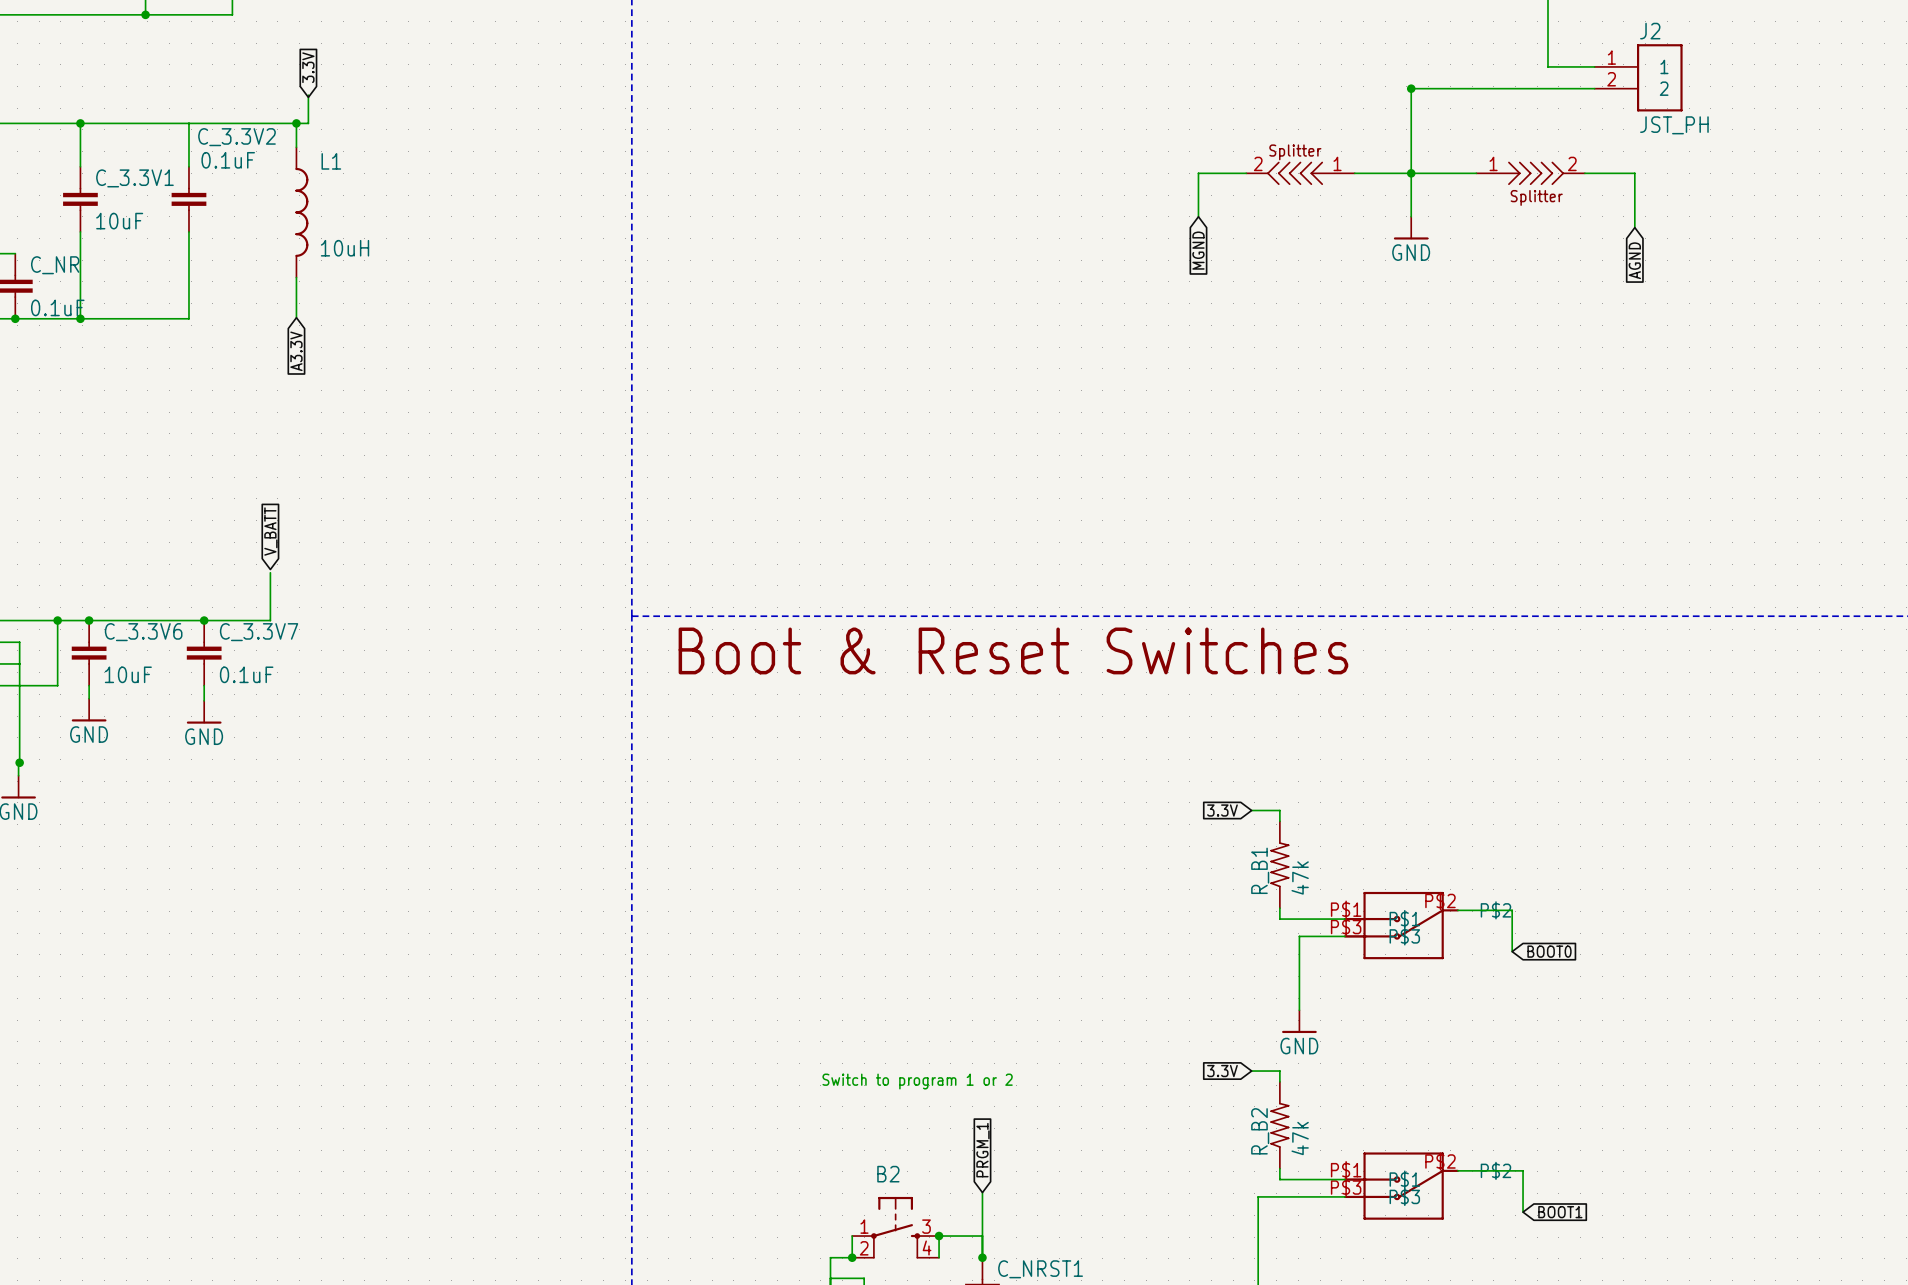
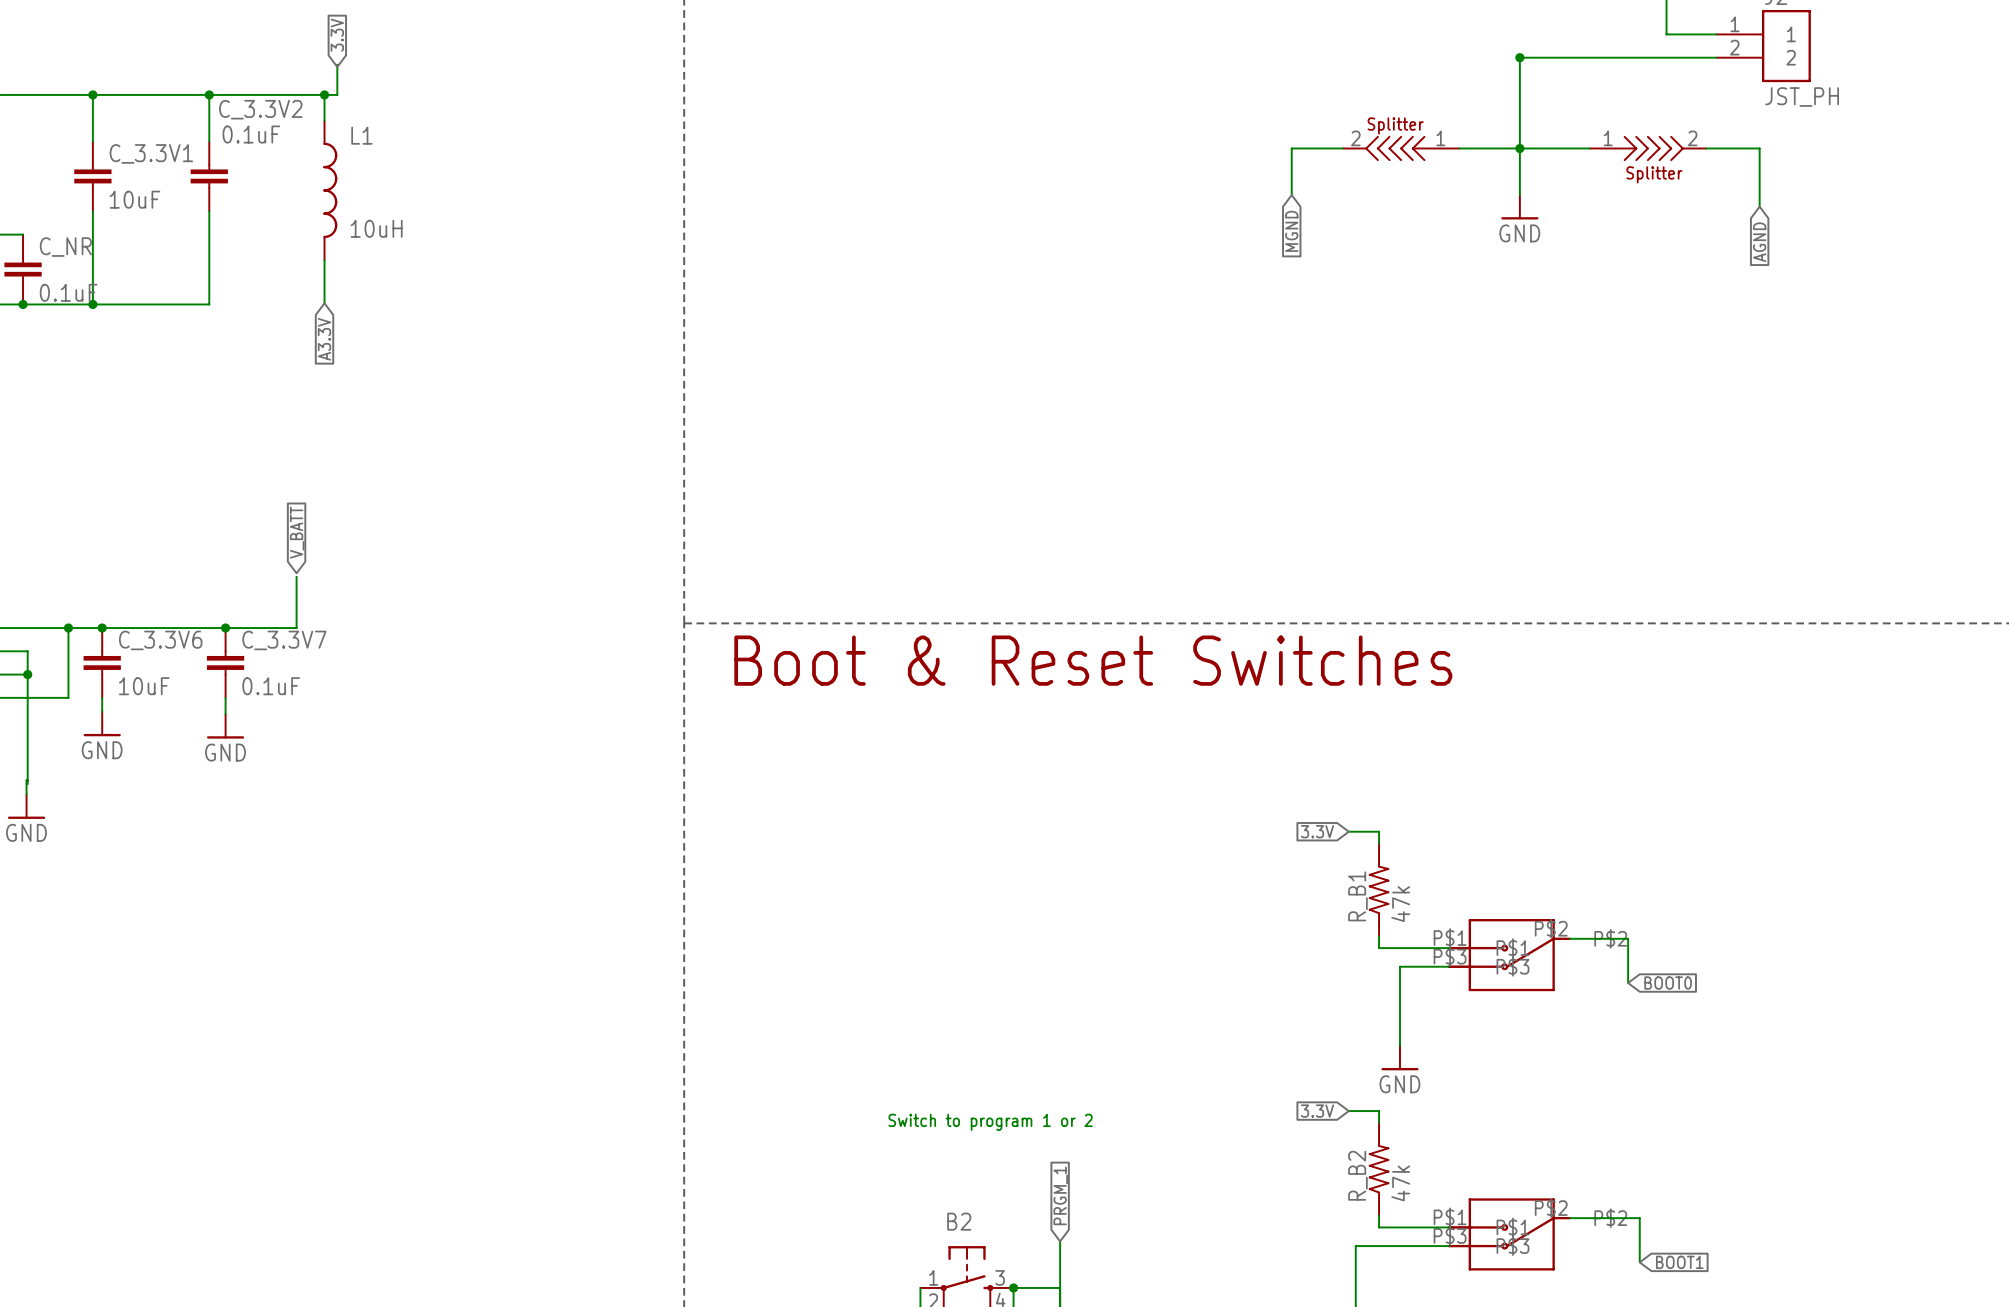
junction: none -> (209, 94)
junction: none -> (27, 674)
junction: (19, 762) -> none

